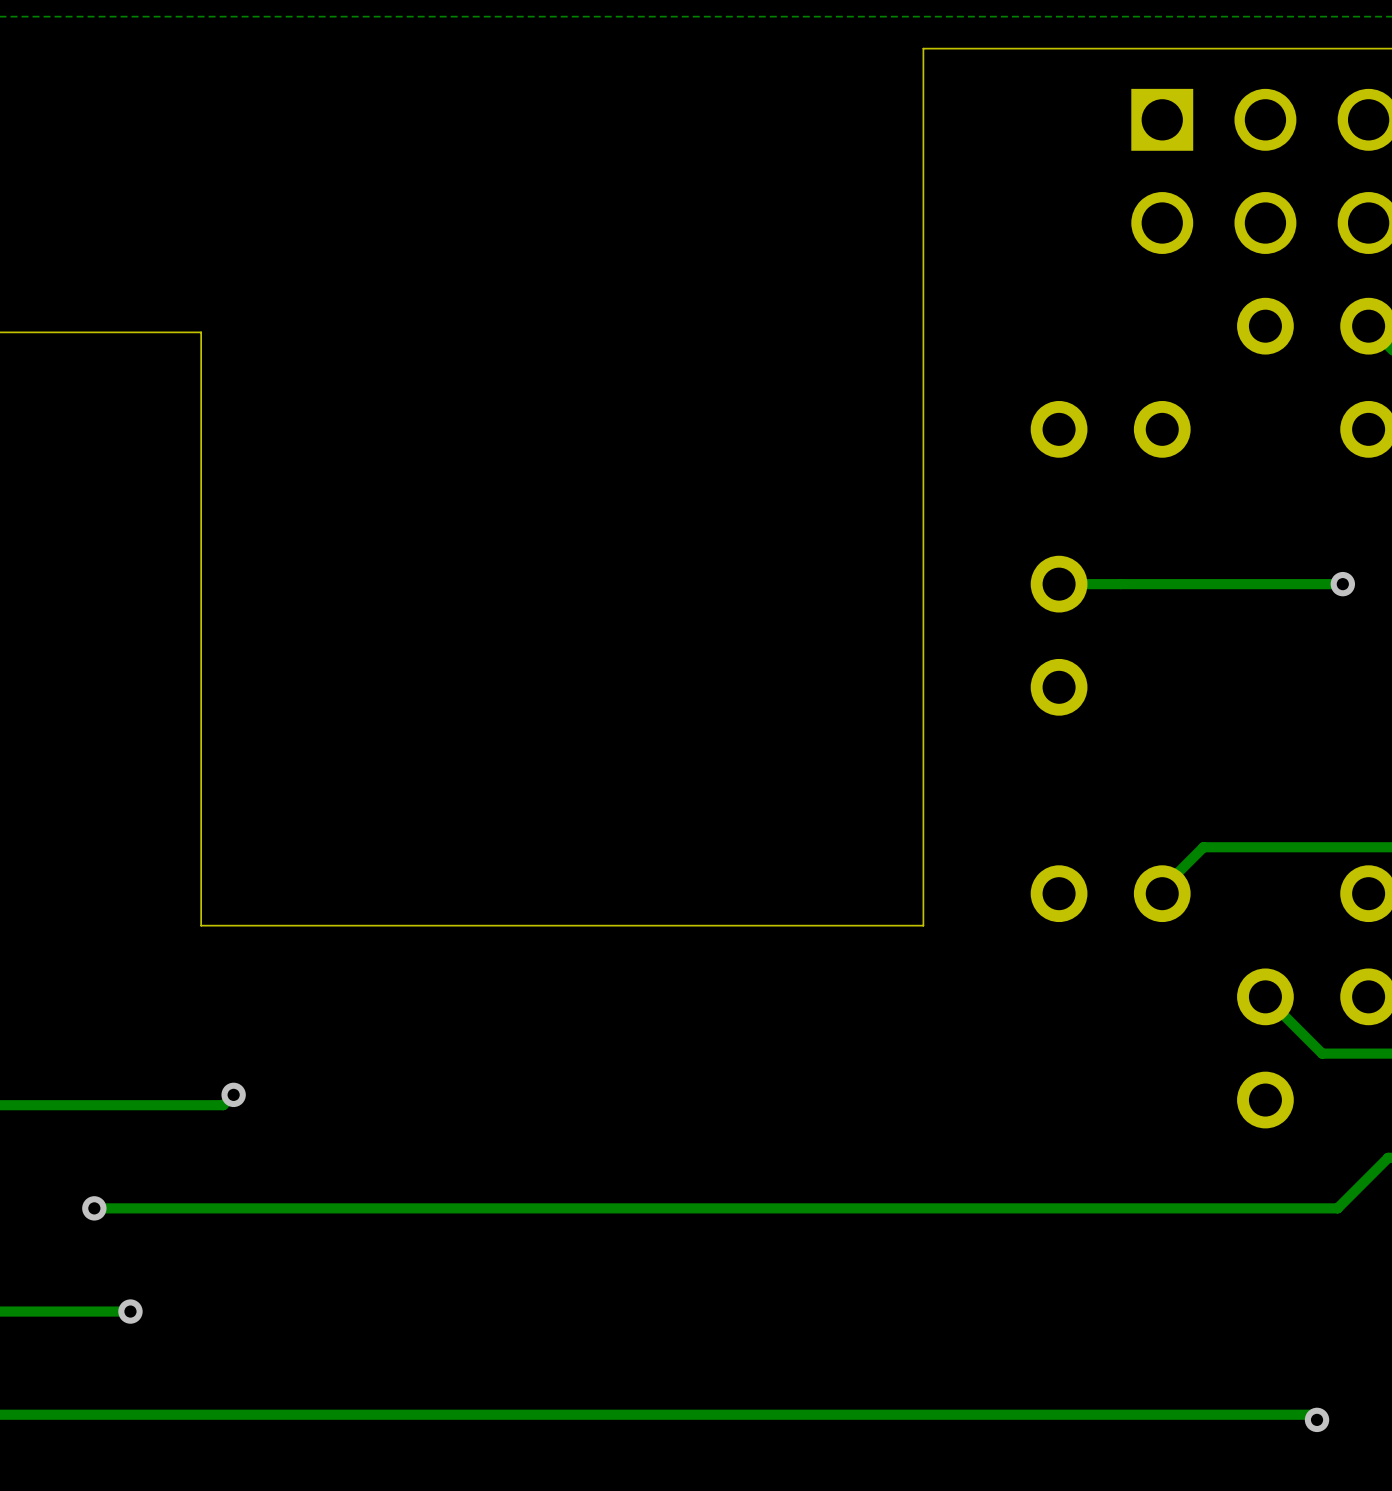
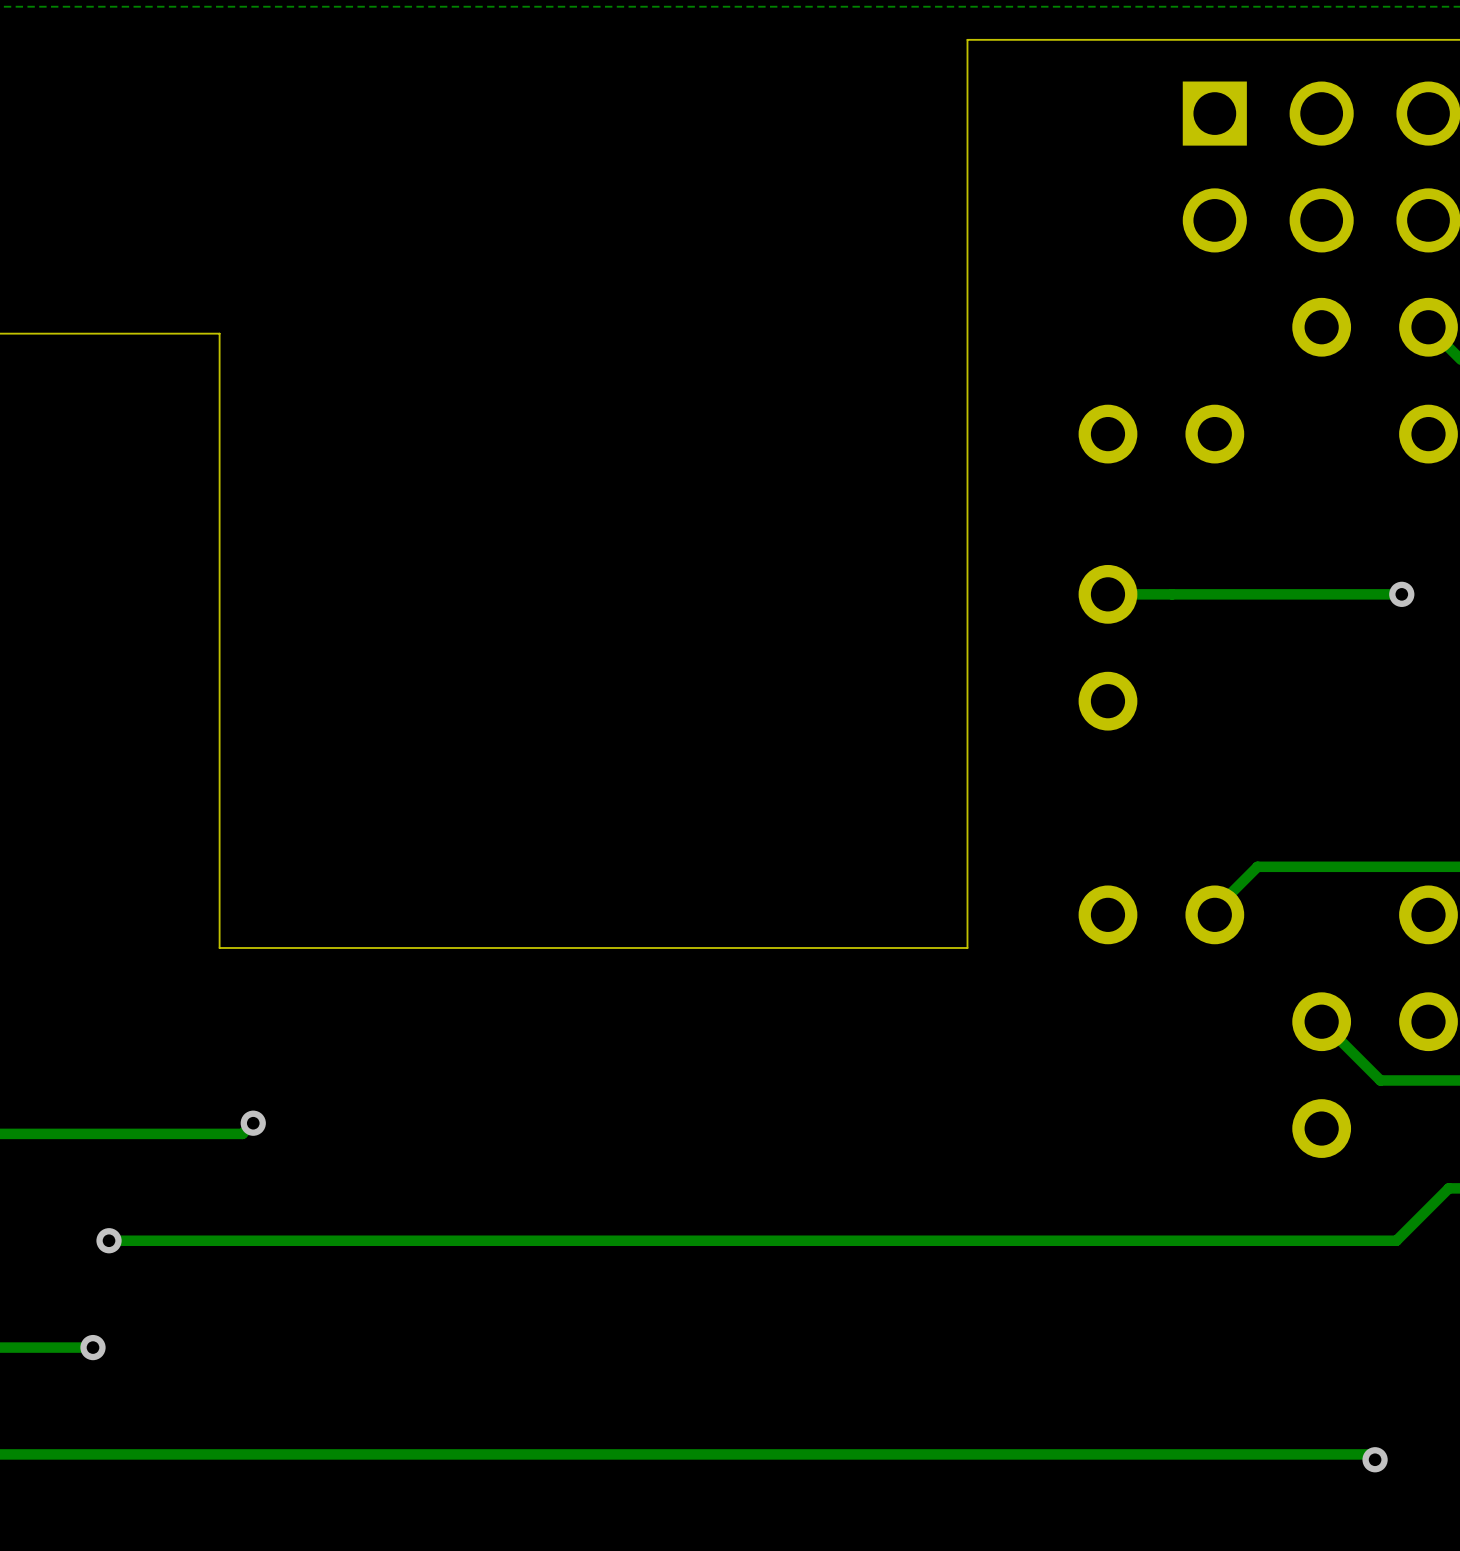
track: (130, 1311) (78, 1311) -> none
via position: (130, 1311) -> (93, 1347)

